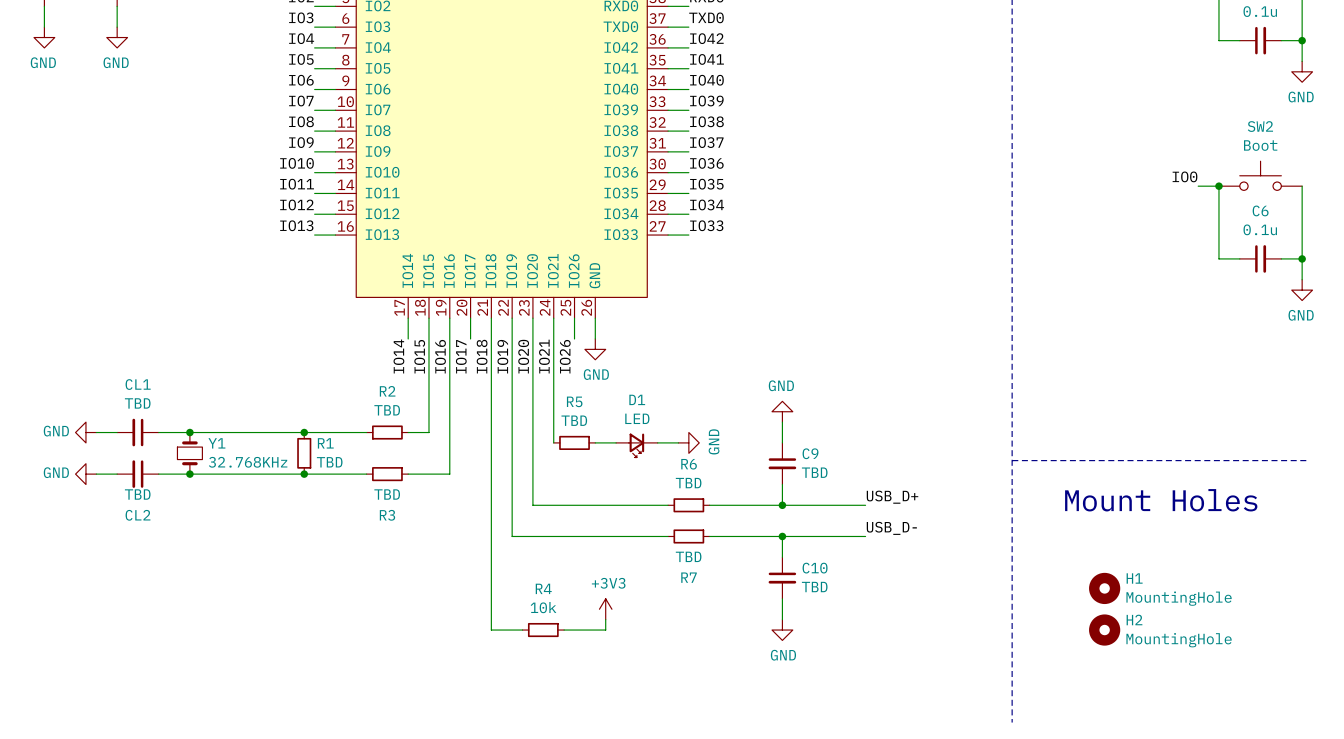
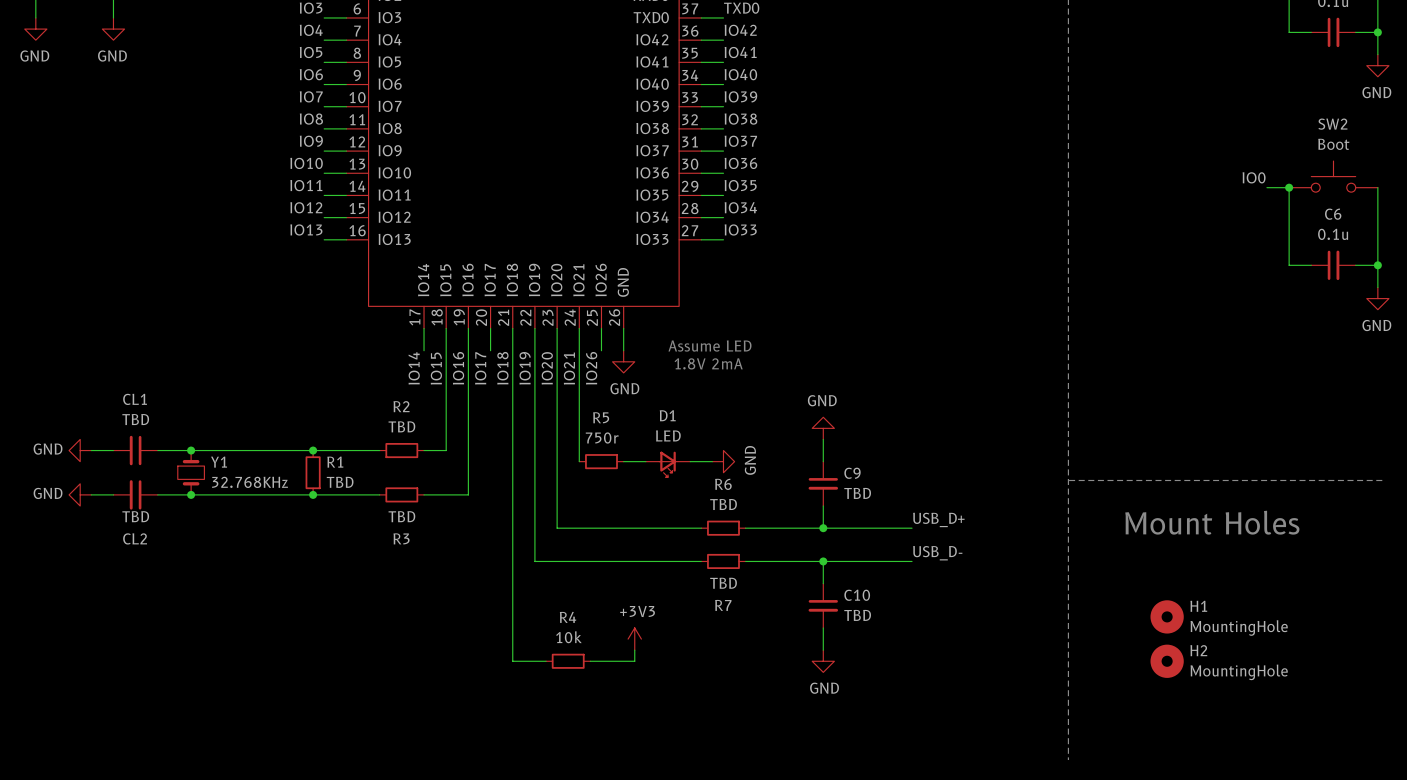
text: none -> Assume LED (709, 346)
text: none -> 1.8V 2mA (708, 363)
R5 value: TBD (574, 420) -> 750r (602, 438)

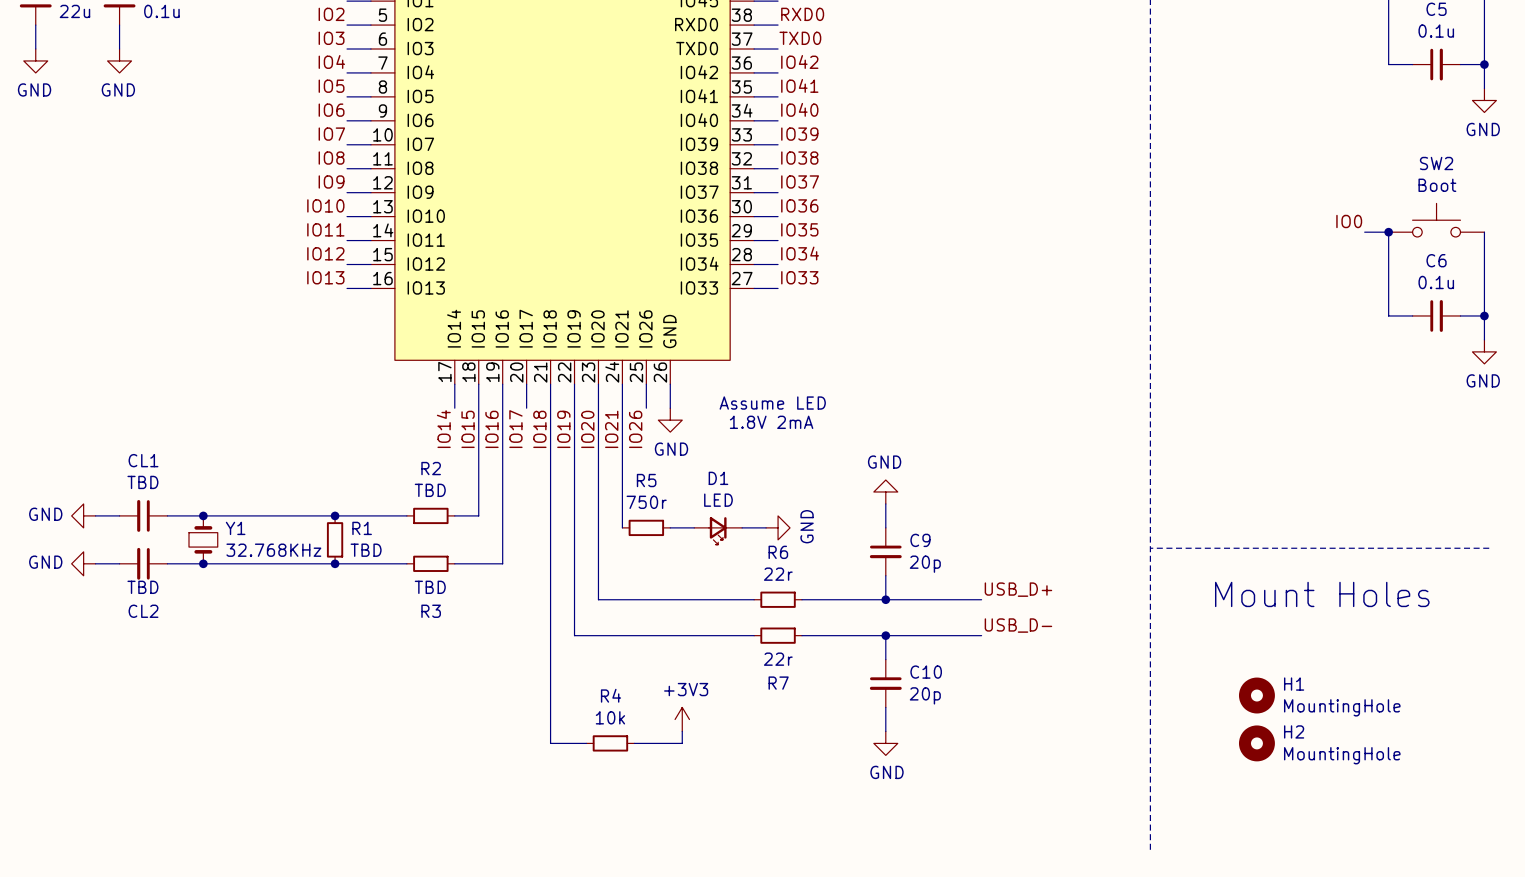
C9 value: TBD (857, 493) -> 20p (925, 564)
R6 value: TBD (723, 504) -> 22r (778, 574)
R7 value: TBD (723, 583) -> 22r (778, 659)
C10 value: TBD (857, 615) -> 20p (925, 695)

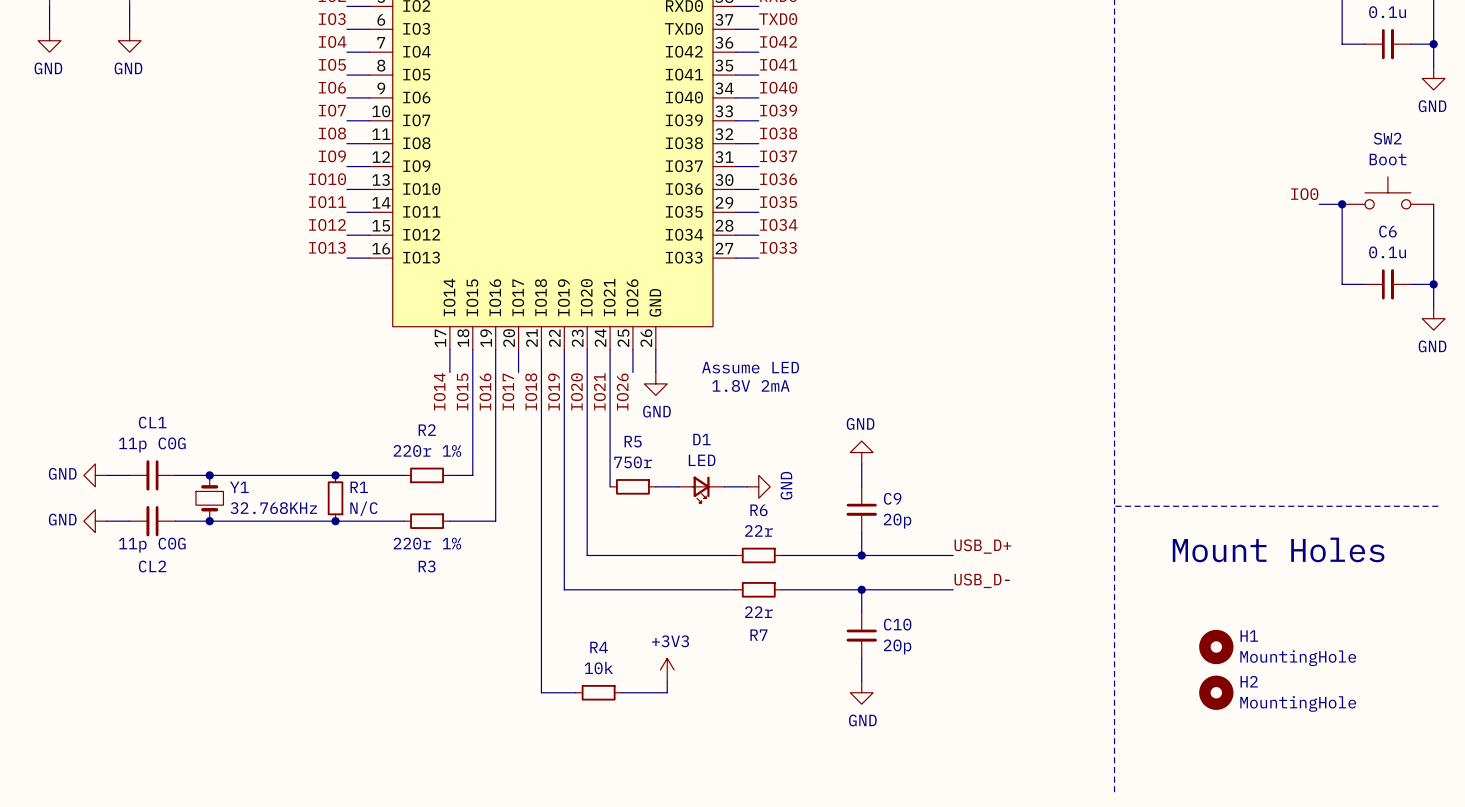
CL1 value: TBD (142, 482) -> 11p C0G (152, 444)
R2 value: TBD (430, 490) -> 220r 1% (427, 450)
R1 value: TBD (366, 550) -> N/C (363, 508)
CL2 value: TBD (142, 587) -> 11p C0G (152, 545)
R3 value: TBD (430, 587) -> 220r 1% (427, 543)

